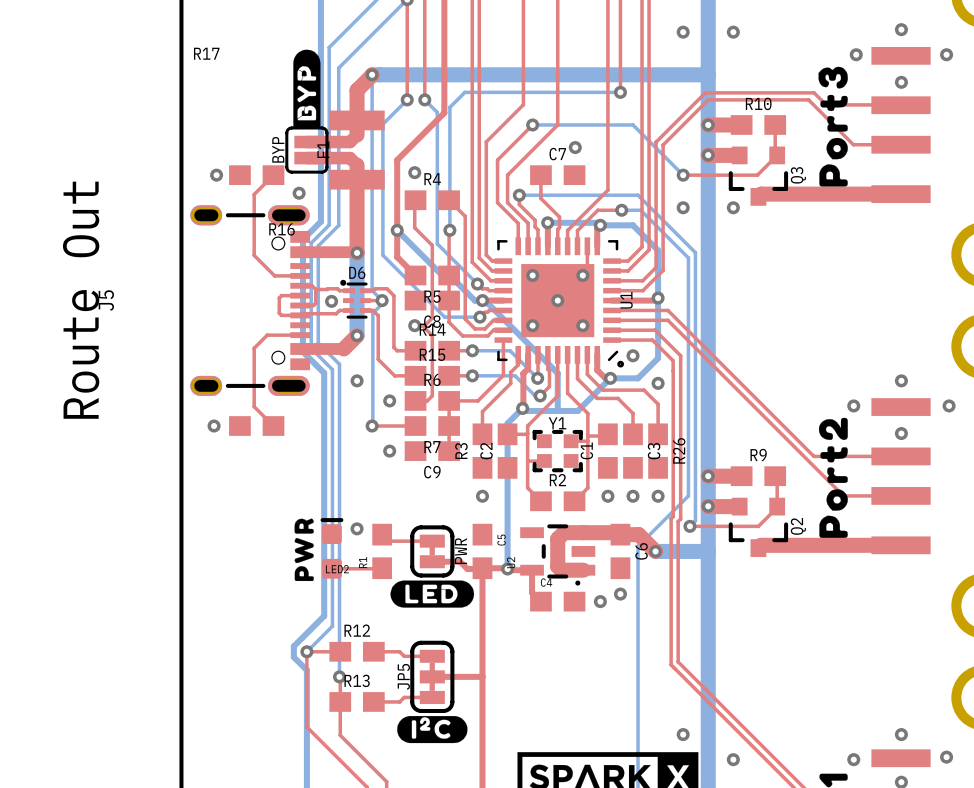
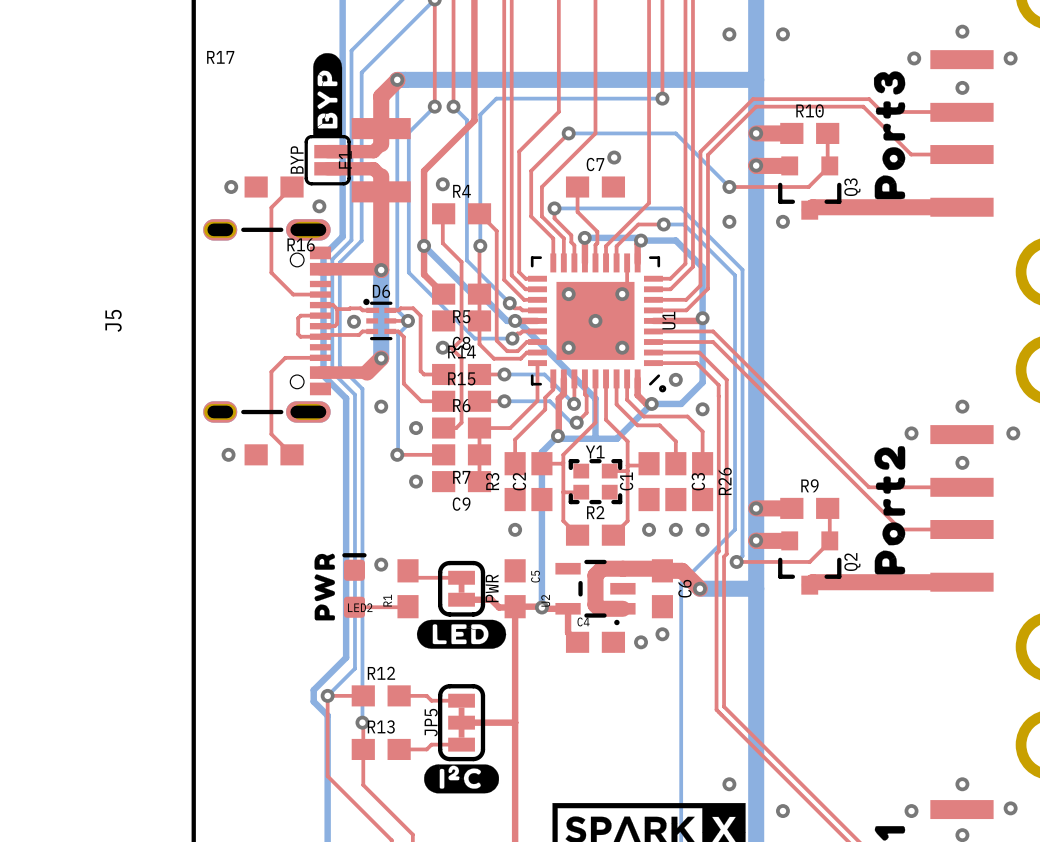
text: Route Out (81, 300) -> none

